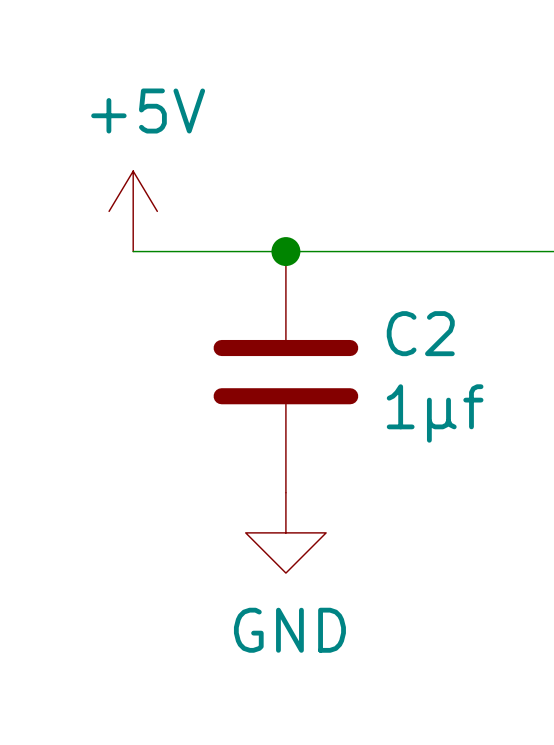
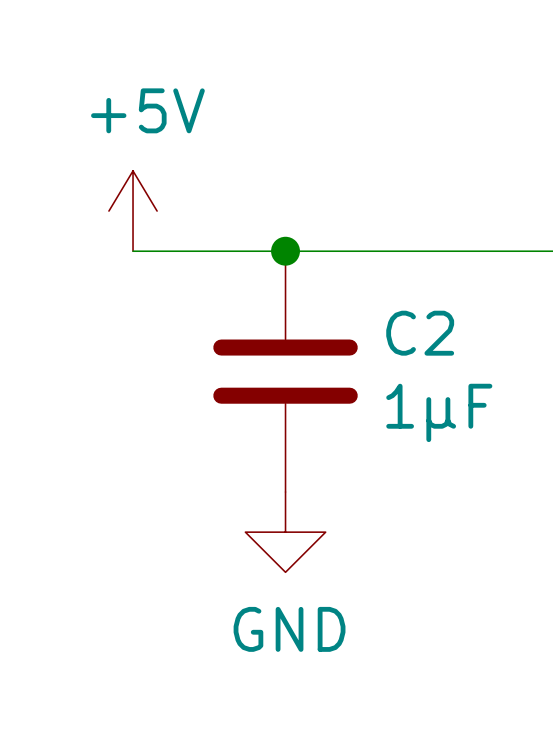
C2 value: 1µf (435, 413) -> 1µF (439, 412)

